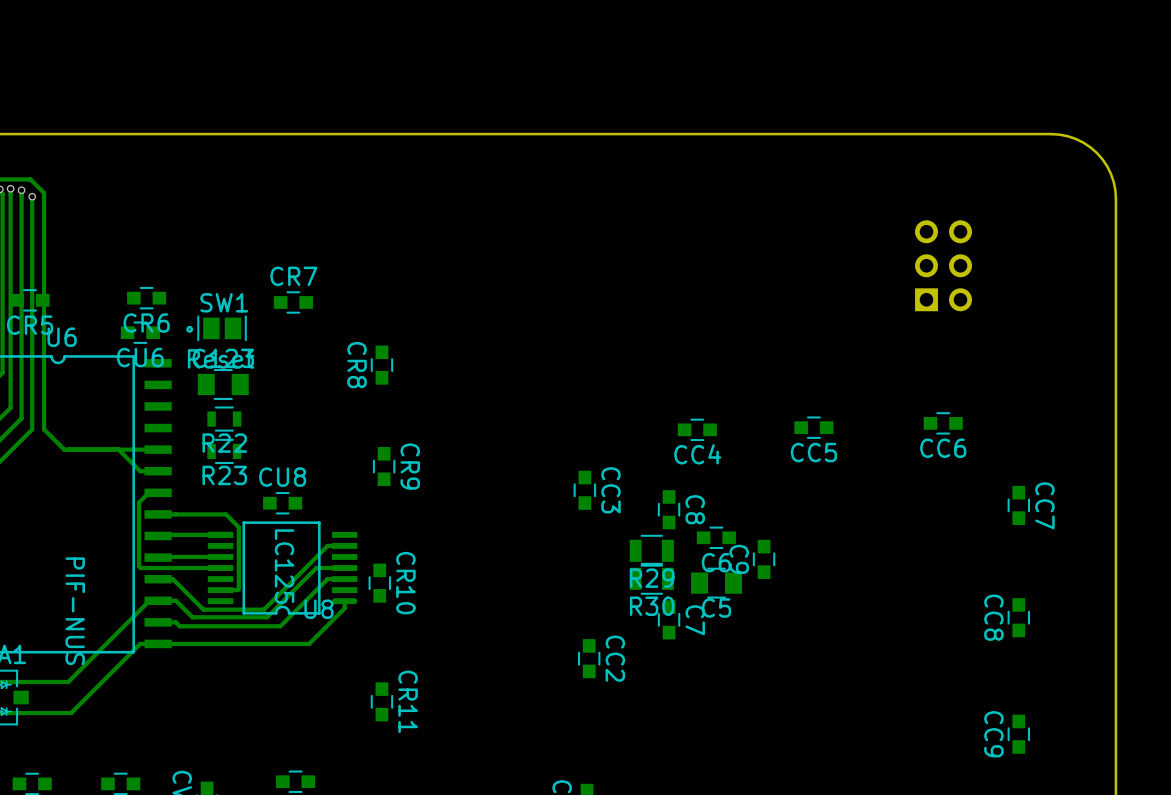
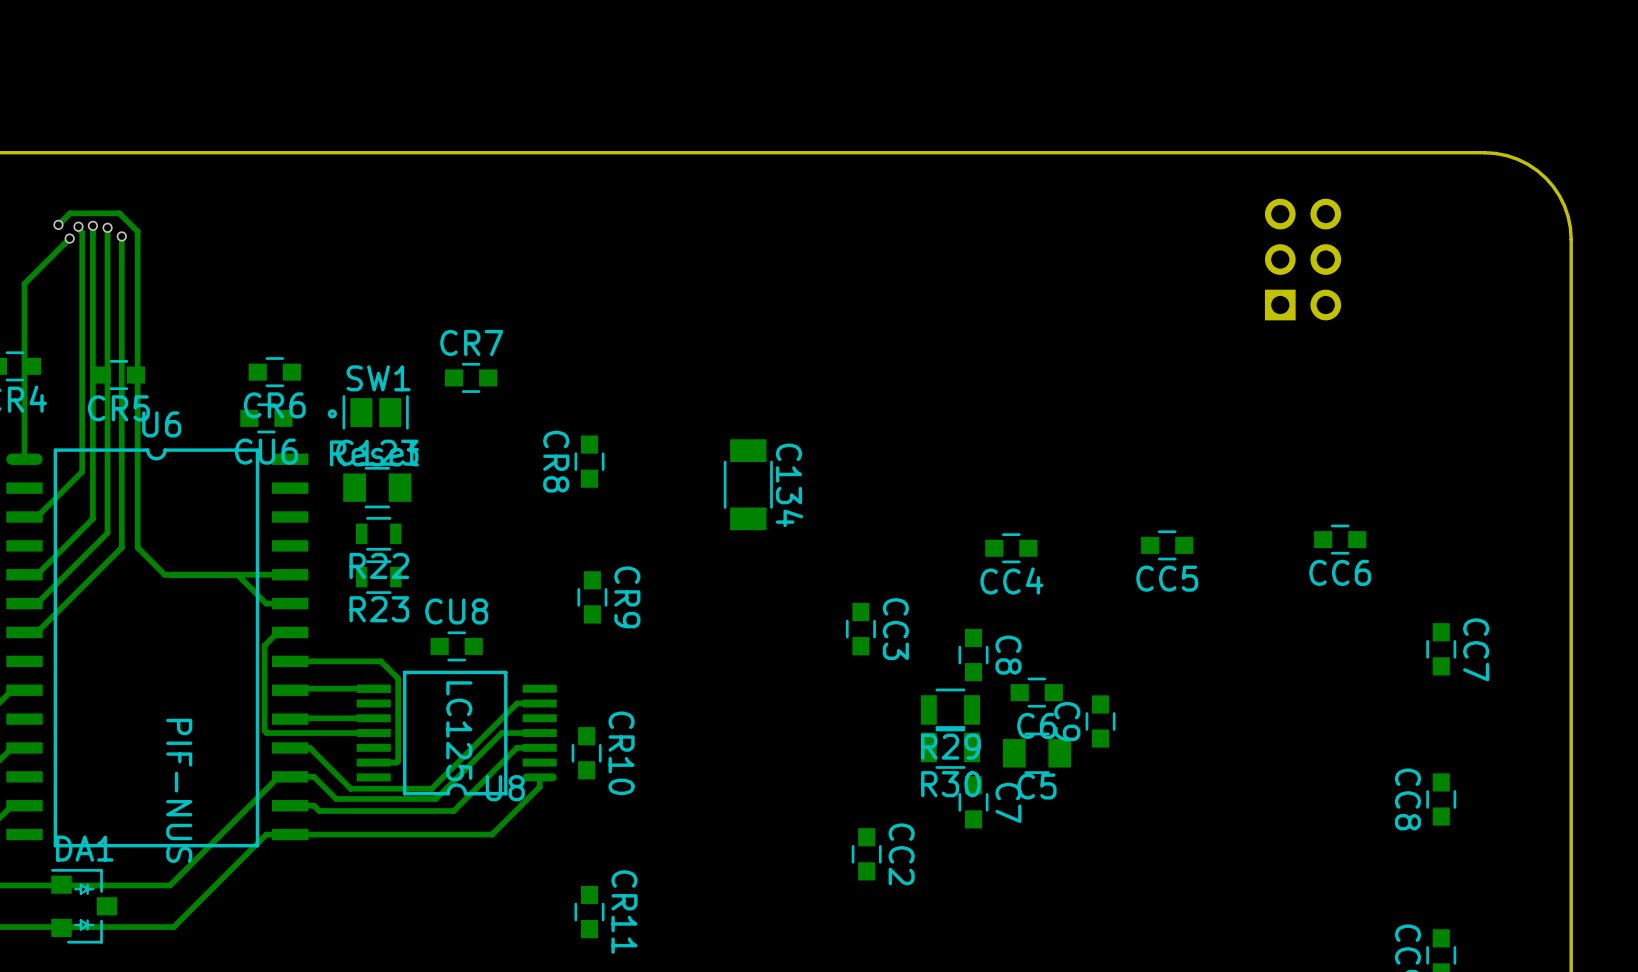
part position: (943, 265) -> (1303, 259)
C134: none -> (748, 484)

